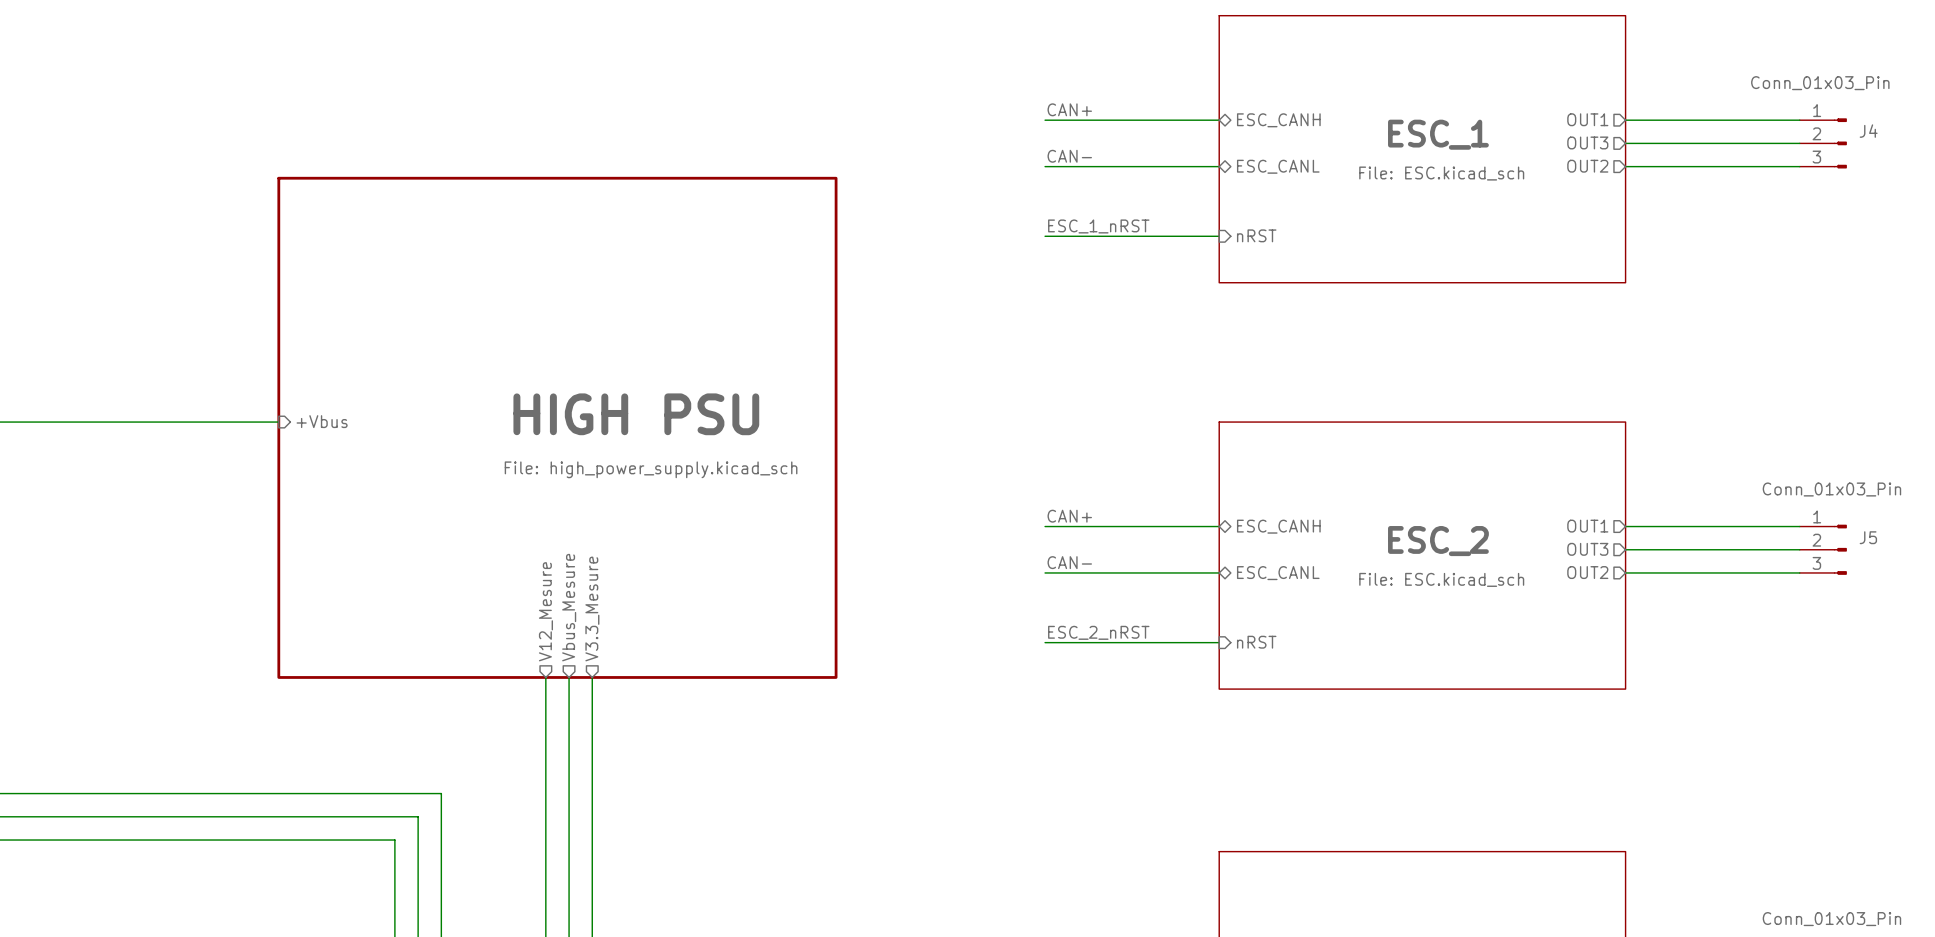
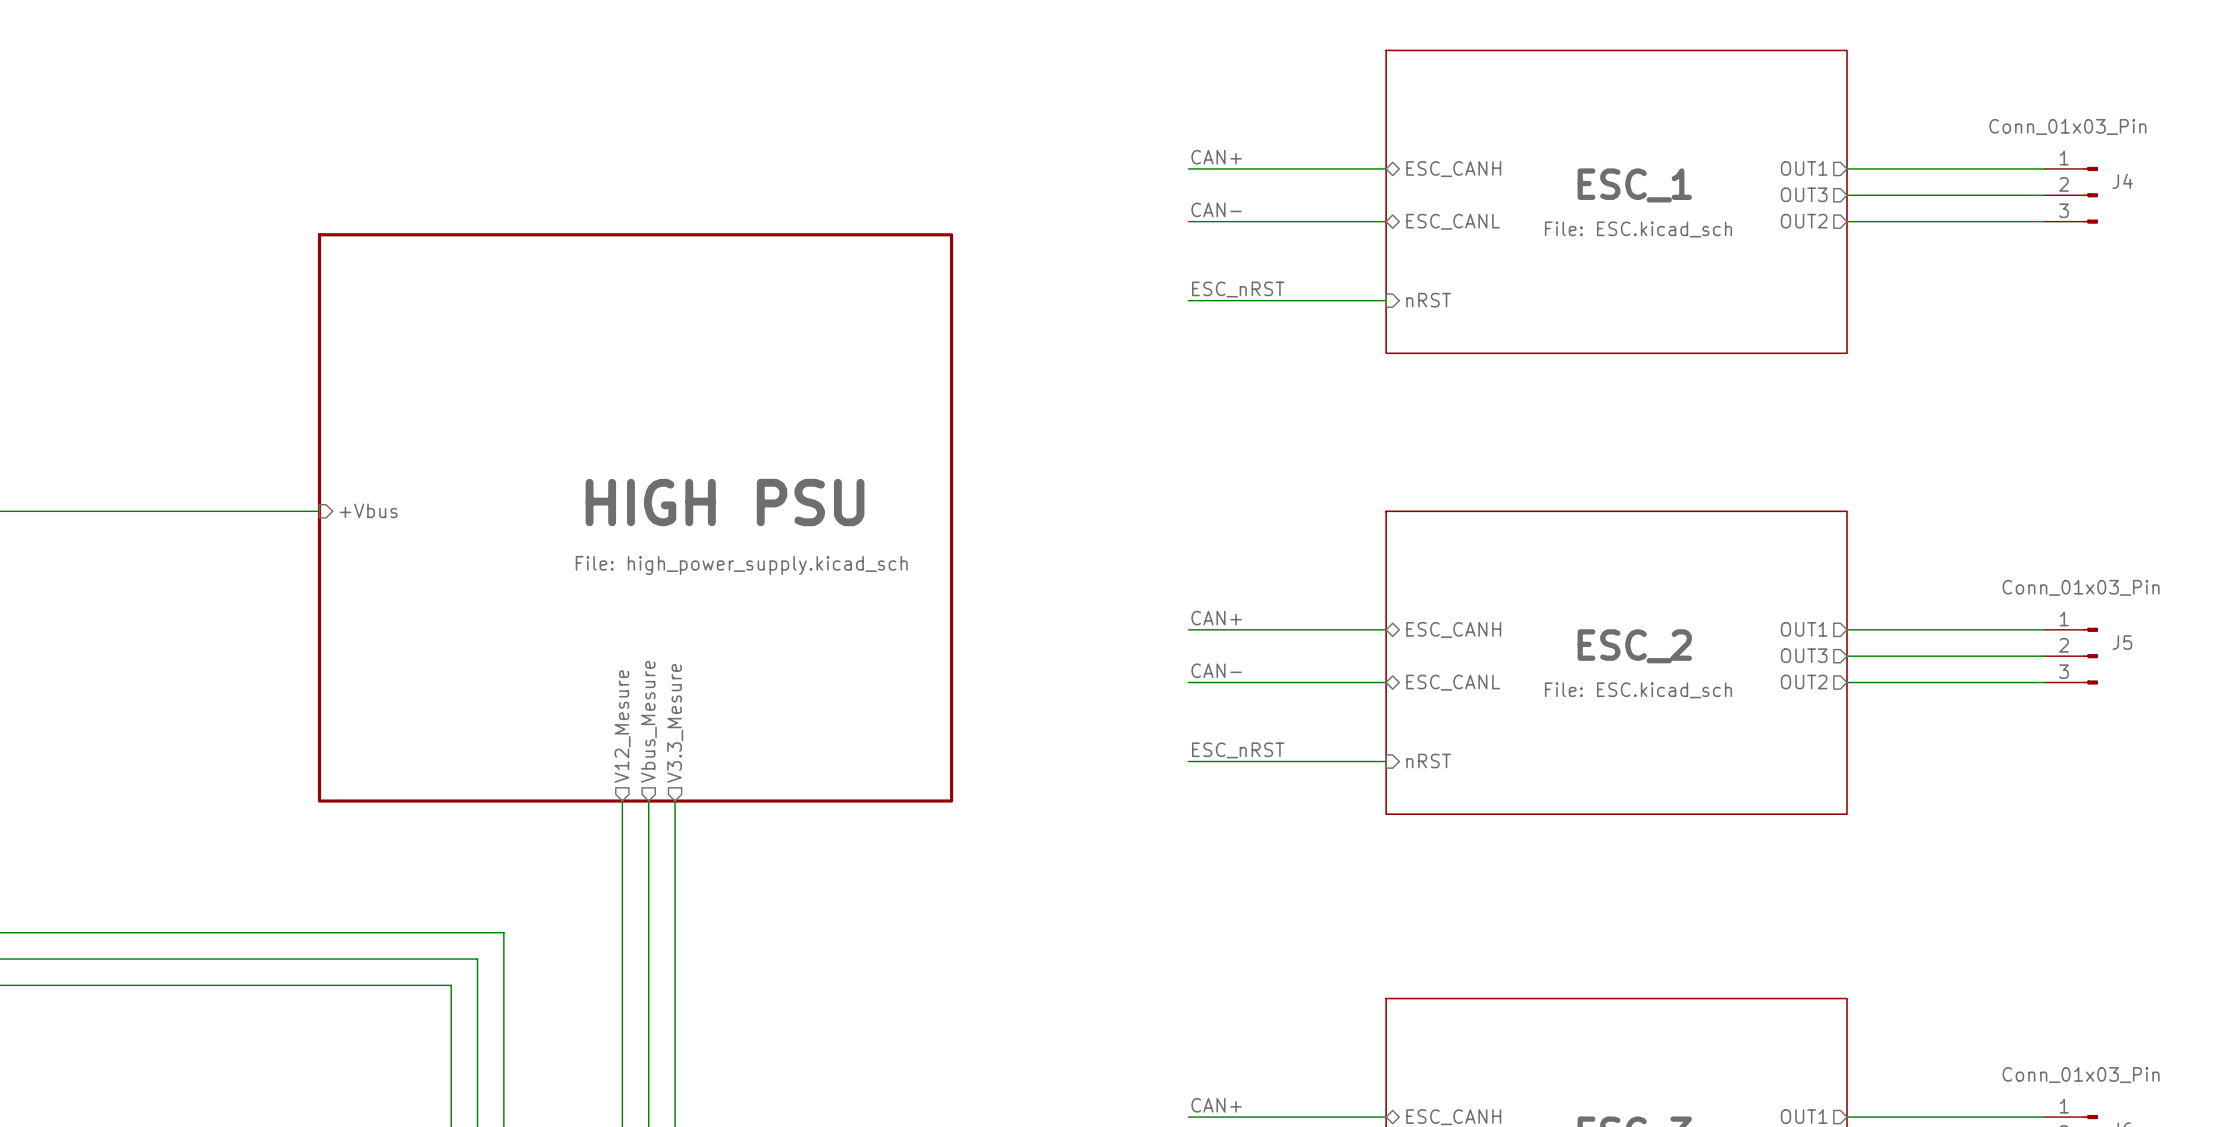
label: ESC_1_nRST (1098, 226) -> ESC_nRST (1238, 289)
label: ESC_2_nRST (1098, 632) -> ESC_nRST (1238, 750)

